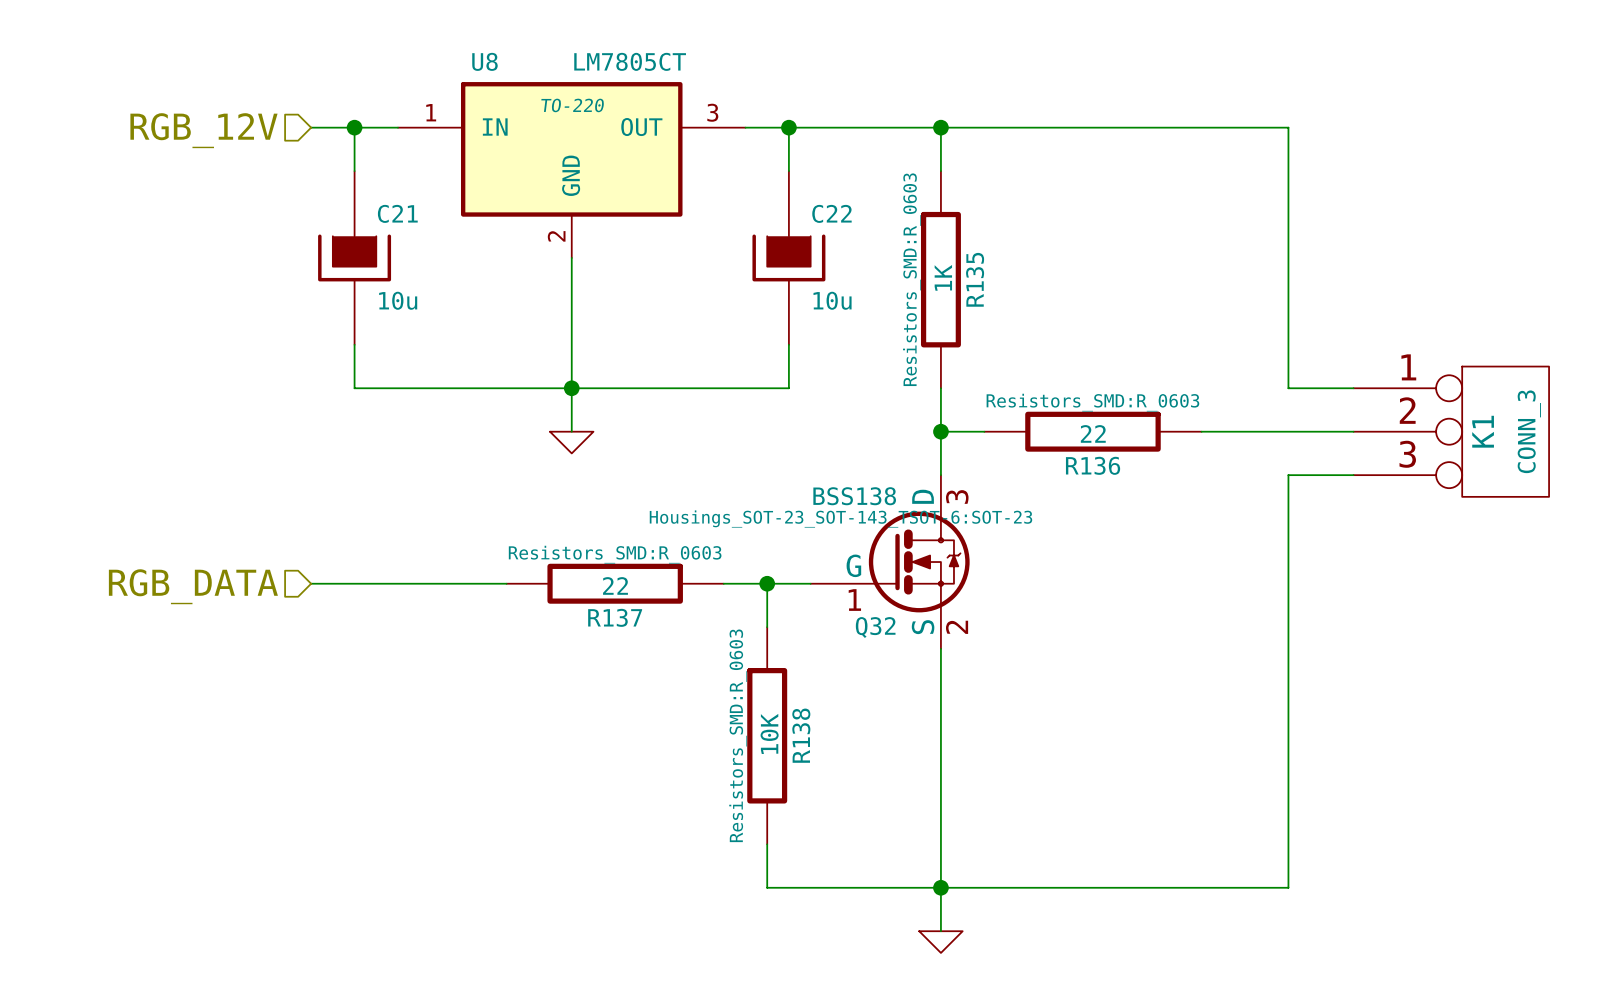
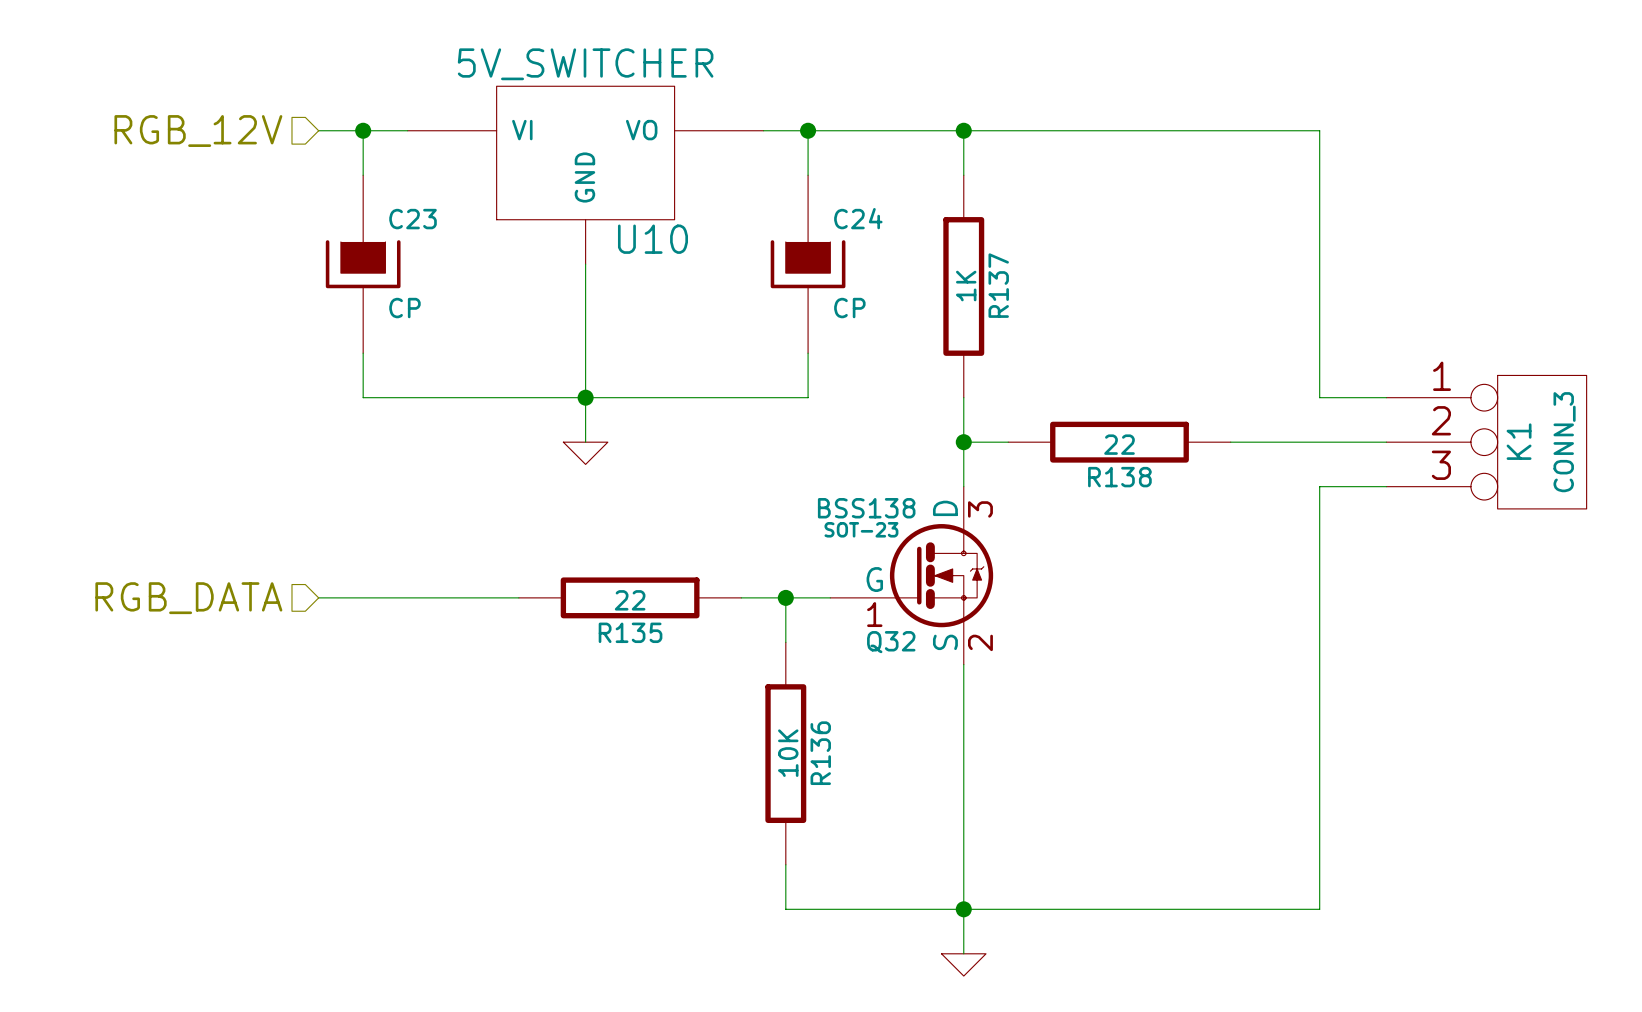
U8: LM7805CT (571, 170) -> none
U10: none -> 5V_SWITCHER (585, 175)
C21 name: C21 (397, 213) -> C23 (413, 219)
C22 name: C22 (831, 213) -> C24 (858, 218)
R135 text: Resistors_SMD:R_0603 (911, 279) -> none
R135 name: R135 (975, 279) -> R137 (998, 285)
C21 value: 10u (398, 300) -> CP (404, 308)
C22 value: 10u (832, 300) -> CP (849, 308)
R136 text: Resistors_SMD:R_0603 (1092, 402) -> none
R136 name: R136 (1093, 465) -> R138 (1119, 477)
Q32 text: Housings_SOT-23_SOT-143_TSOT-6:SOT-23 (840, 519) -> SOT-23 (861, 529)
R137 text: Resistors_SMD:R_0603 (615, 554) -> none
R137 name: R137 (615, 617) -> R135 (630, 632)
R138 text: Resistors_SMD:R_0603 (738, 735) -> none
R138 name: R138 (801, 735) -> R136 (820, 753)

